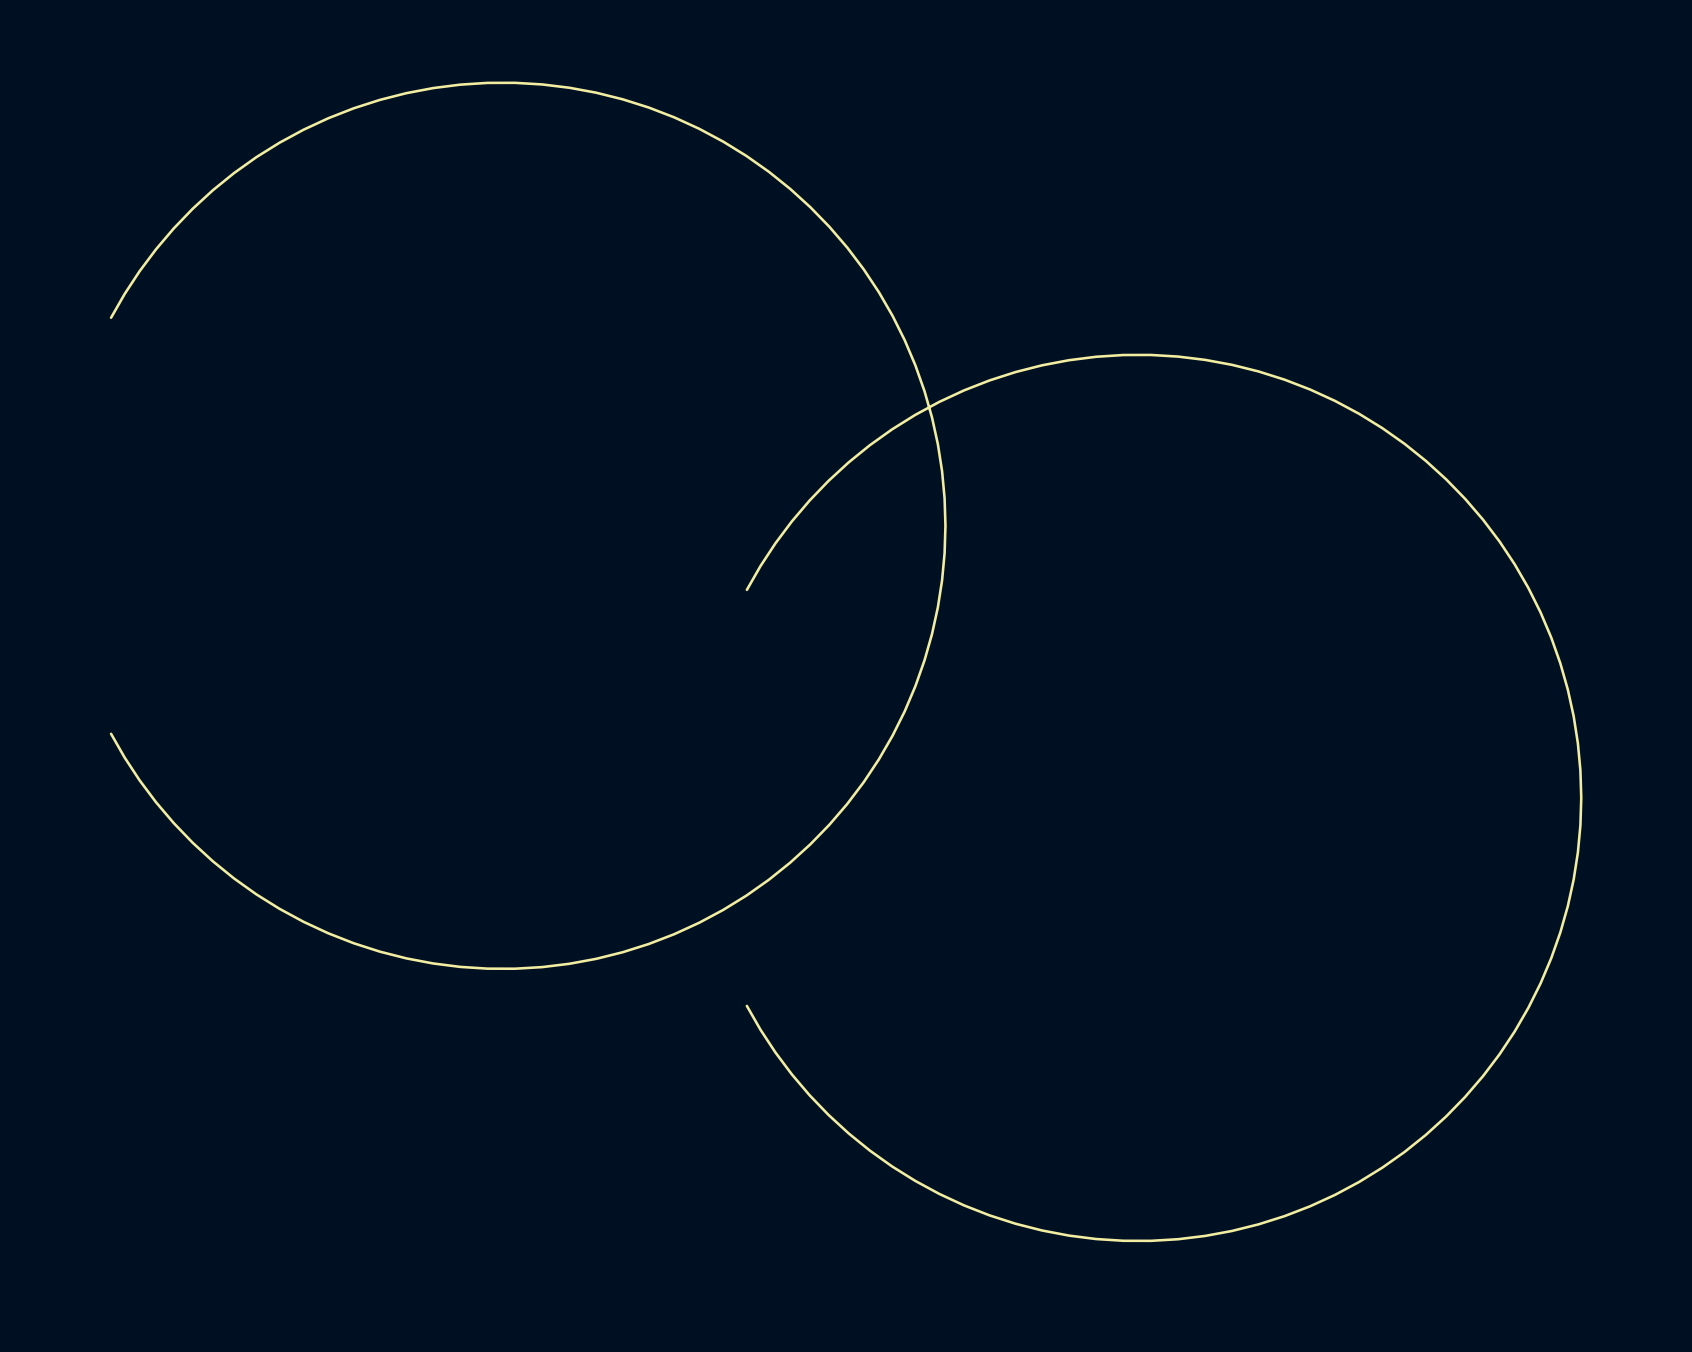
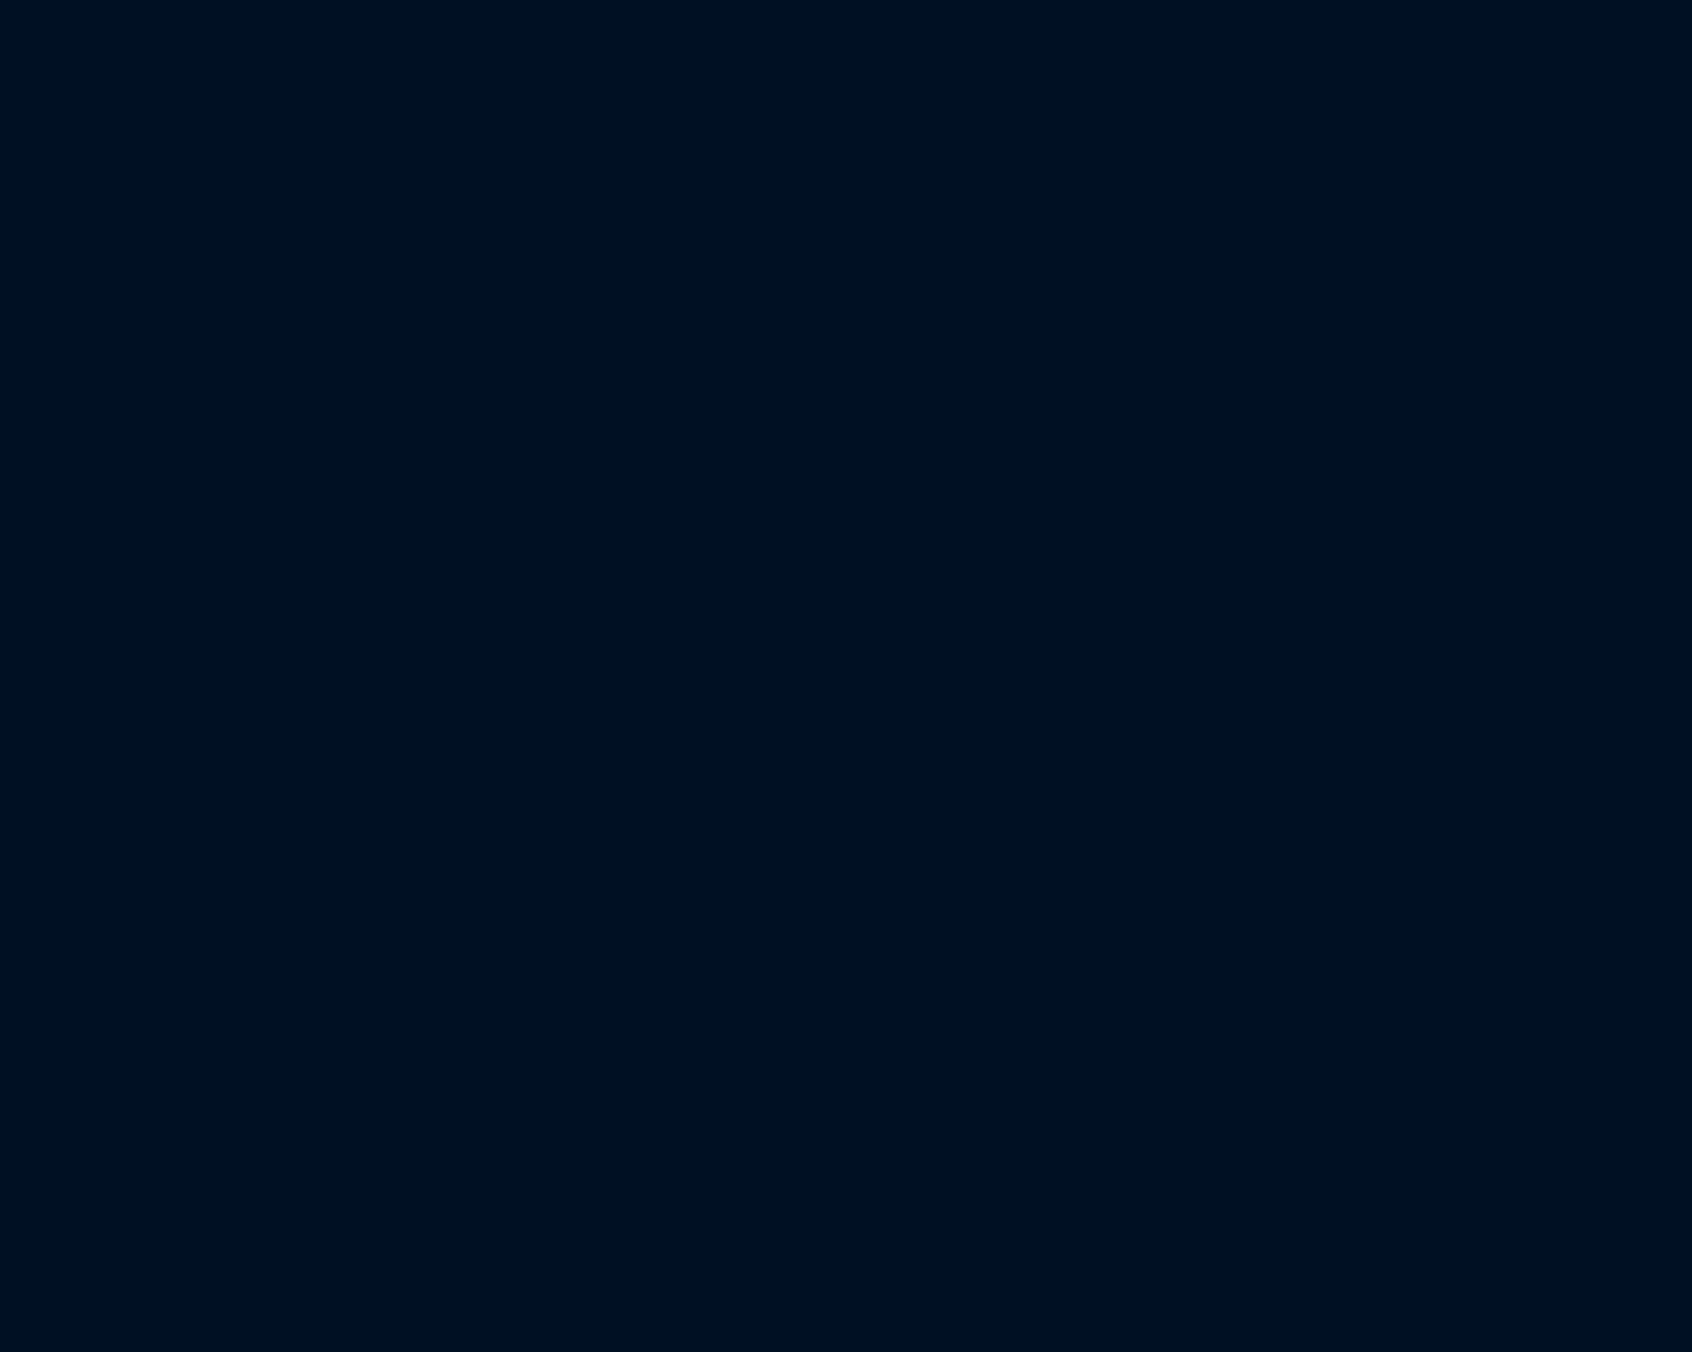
line: (111, 317) (139, 271) (156, 249) (192, 208) (234, 173) (256, 157) (303, 129) (353, 108) (379, 99) (433, 88) (487, 82) (514, 82) (542, 84) (596, 92) (648, 107) (674, 117) (699, 128) (746, 156) (768, 171) (810, 207) (847, 247) (878, 292) (904, 340) (915, 365) (932, 417) (937, 444) (942, 471) (945, 525) (942, 580) (937, 607) (932, 634) (915, 686) (892, 735) (878, 759) (847, 803) (829, 824) (790, 862) (746, 895) (699, 922) (648, 943) (622, 952) (596, 958) (542, 967) (487, 968) (433, 963) (406, 958) (353, 943) (328, 933) (303, 921) (256, 894) (234, 878) (192, 842) (173, 823) (139, 780) (111, 733) -> none
line: (746, 589) (775, 543) (791, 521) (809, 500) (848, 462) (892, 429) (939, 401) (964, 390) (1015, 372) (1042, 365) (1068, 360) (1123, 355) (1178, 356) (1205, 359) (1258, 371) (1310, 389) (1359, 413) (1382, 428) (1425, 461) (1446, 479) (1465, 498) (1499, 541) (1528, 587) (1540, 612) (1560, 663) (1573, 716) (1580, 770) (1581, 797) (1577, 852) (1573, 879) (1560, 932) (1540, 983) (1528, 1007) (1499, 1054) (1465, 1096) (1425, 1134) (1404, 1151) (1359, 1182) (1334, 1194) (1284, 1216) (1258, 1224) (1232, 1230) (1178, 1239) (1123, 1240) (1096, 1239) (1042, 1230) (989, 1215) (964, 1205) (939, 1193) (892, 1166) (848, 1133) (828, 1114) (791, 1074) (760, 1029) (746, 1005) -> none

